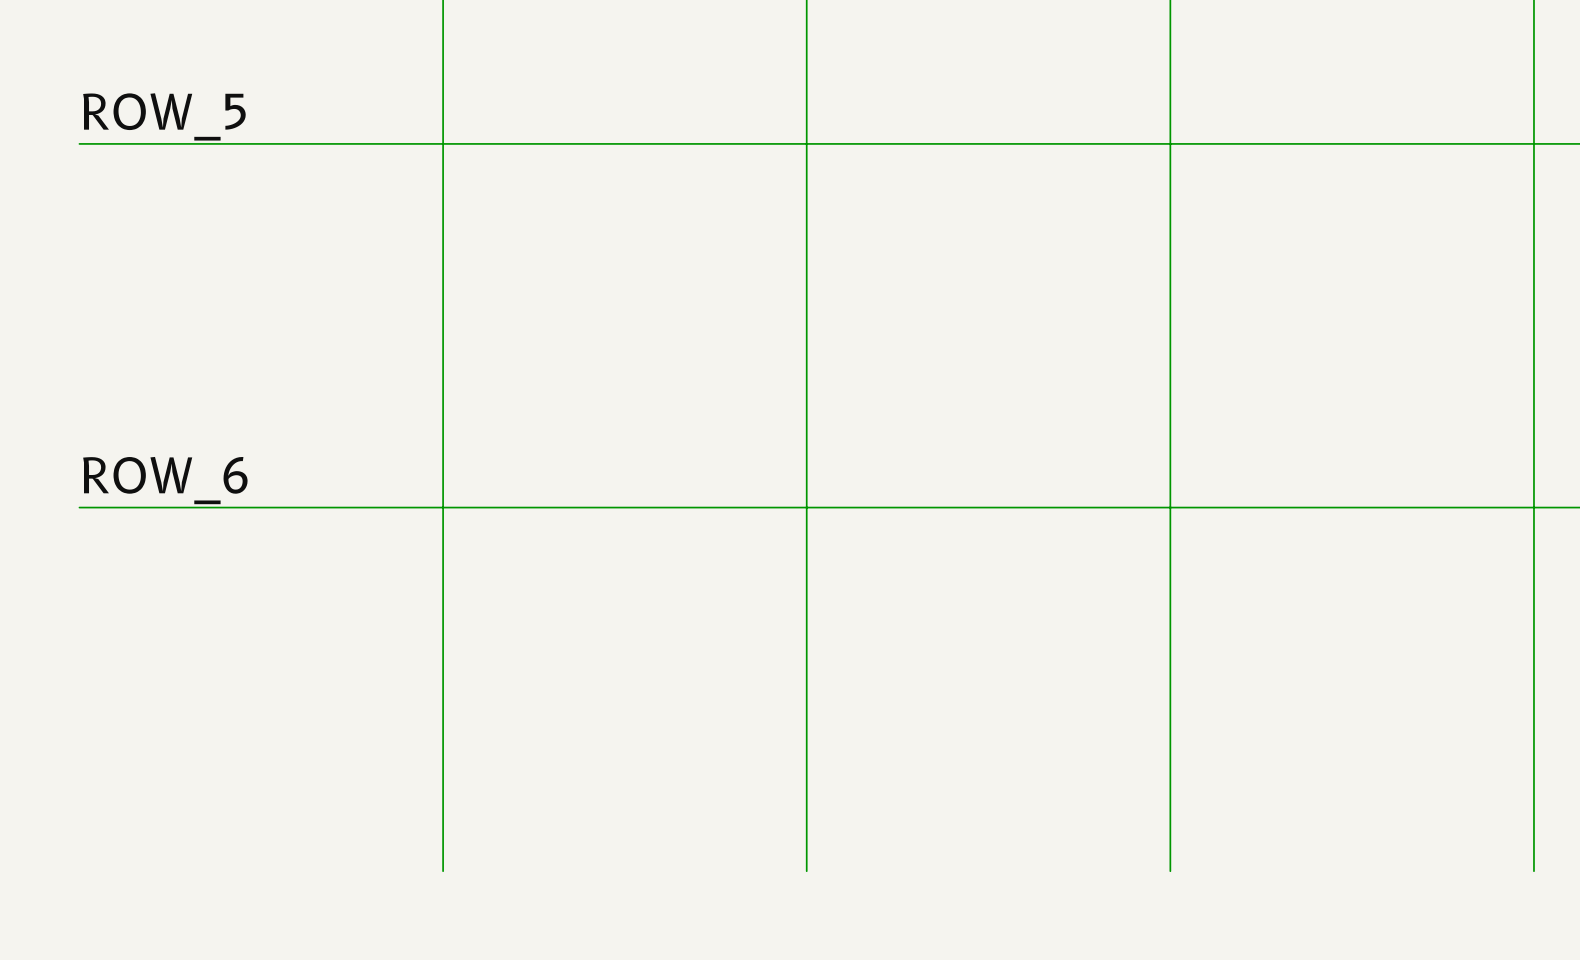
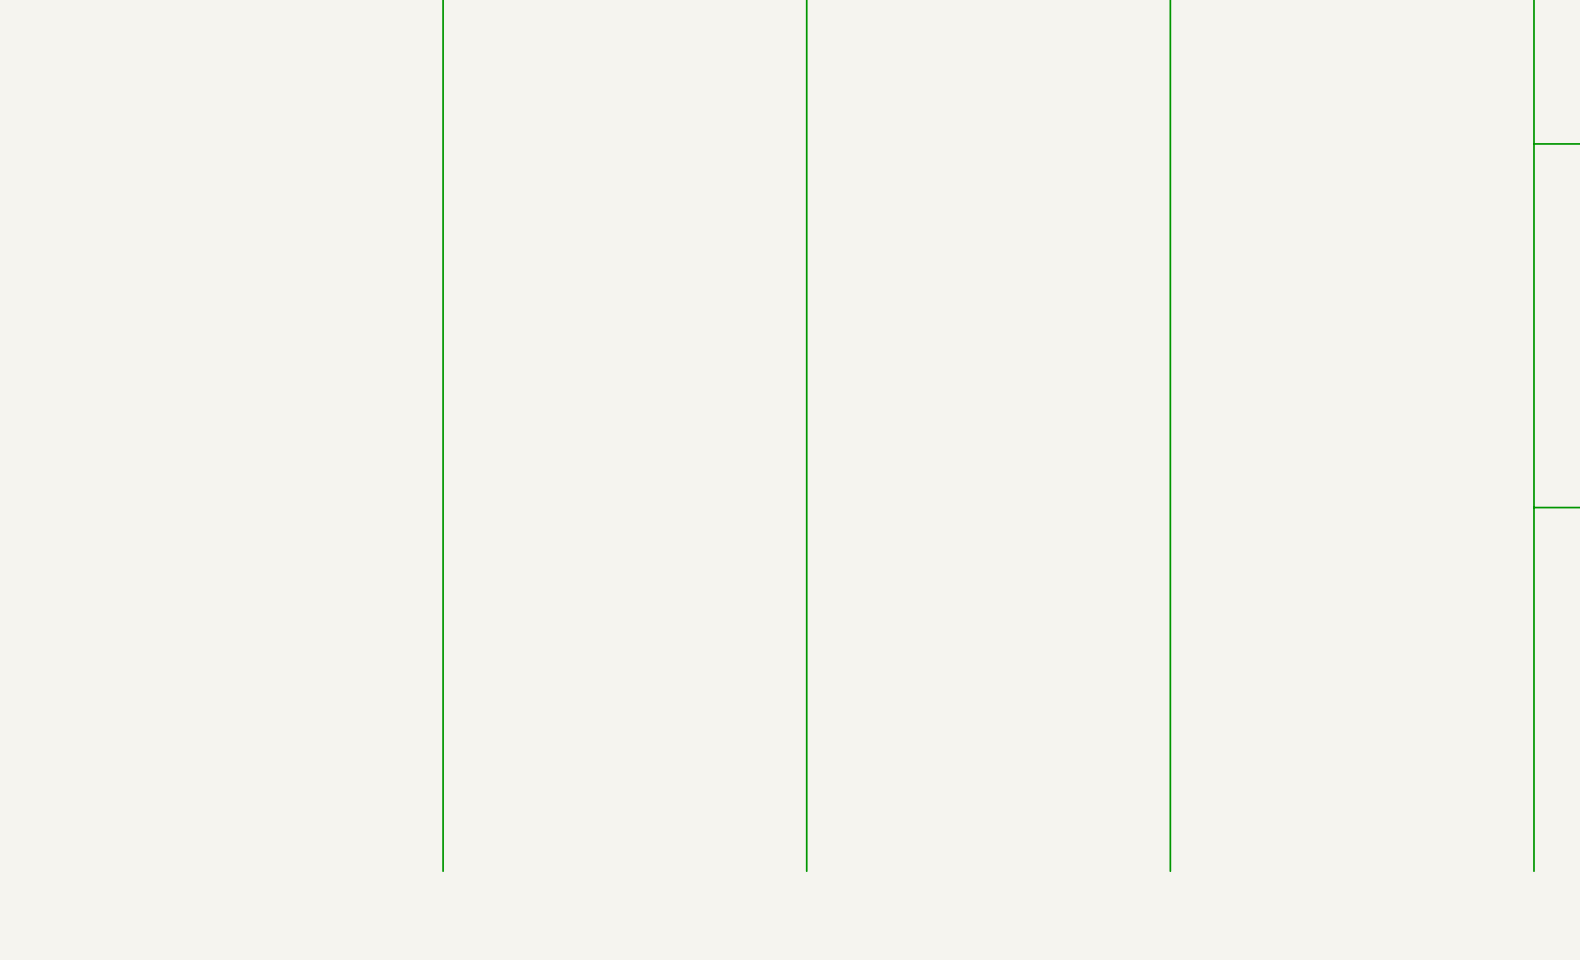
label: ROW_5 (164, 116) -> none
wire: (79, 143) (1533, 143) -> none
label: ROW_6 (165, 480) -> none
wire: (79, 507) (1533, 507) -> none

